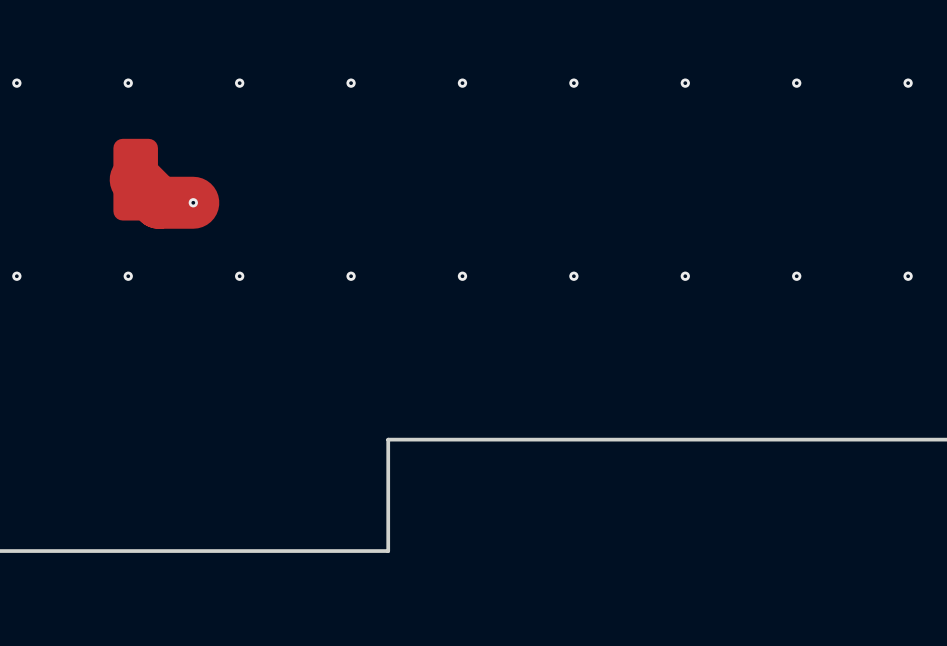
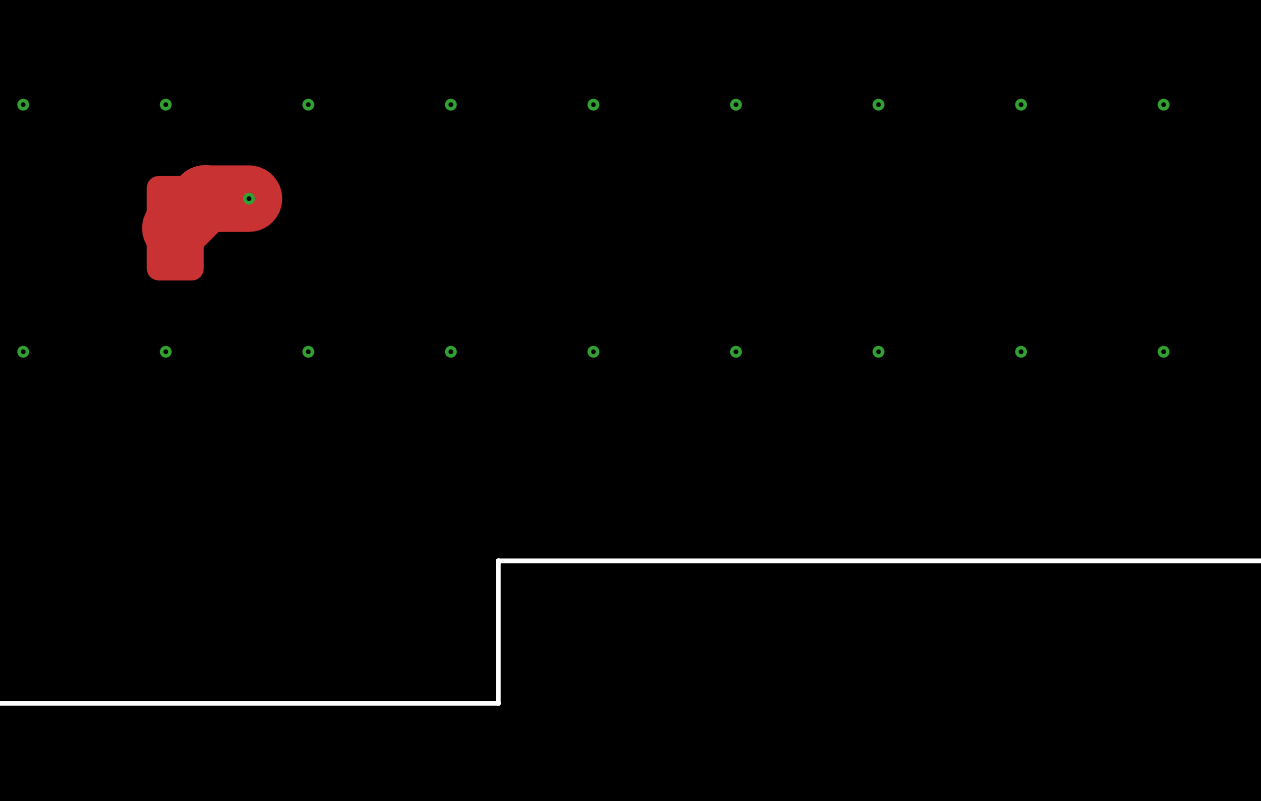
top track: (135, 179) (158, 202) (193, 202) -> (175, 228) (204, 198) (249, 198)
via position: (193, 202) -> (249, 198)

